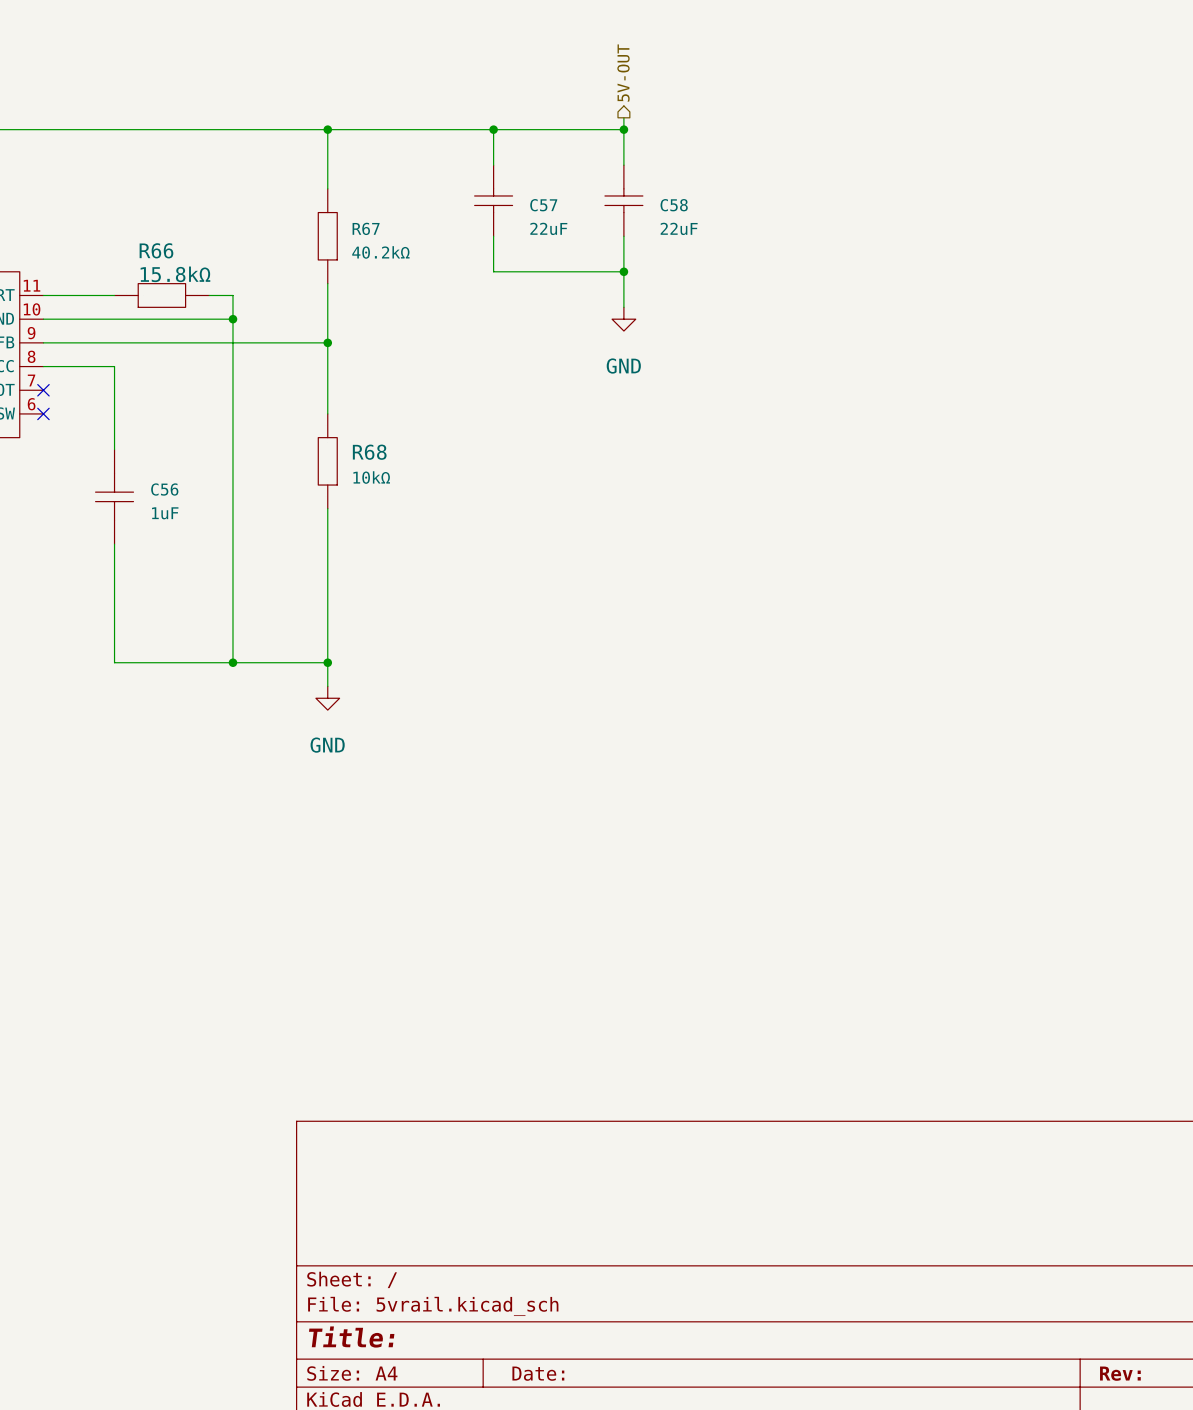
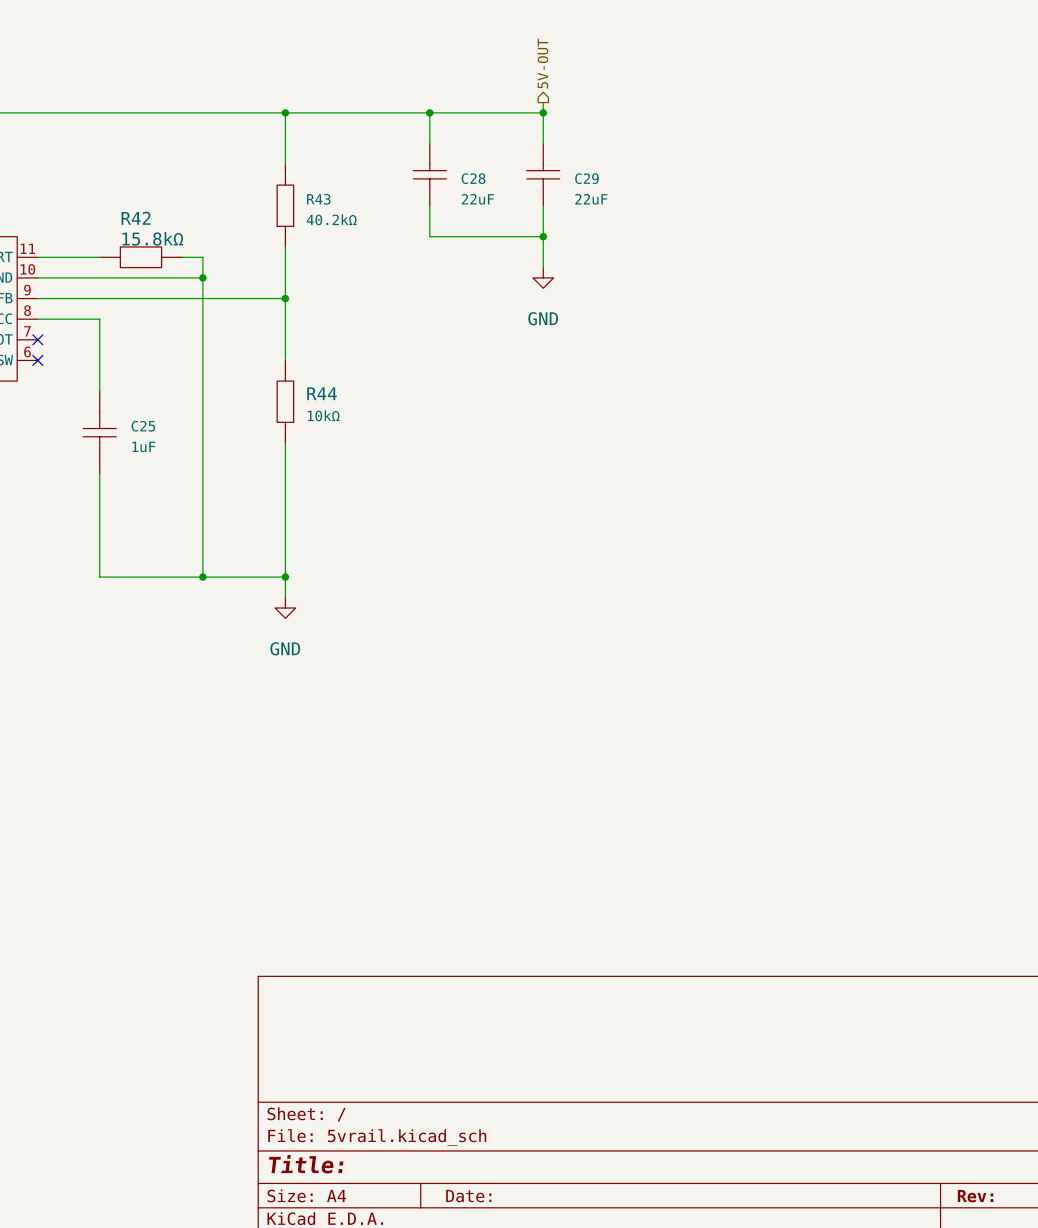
C57 name: C57 (543, 205) -> C28 (473, 178)
C58 name: C58 (674, 205) -> C29 (586, 178)
R67 name: R67 (366, 228) -> R43 (318, 199)
R66 name: R66 (156, 250) -> R42 (136, 218)
R68 name: R68 (369, 452) -> R44 (322, 393)
C56 name: C56 (164, 489) -> C25 (143, 426)

